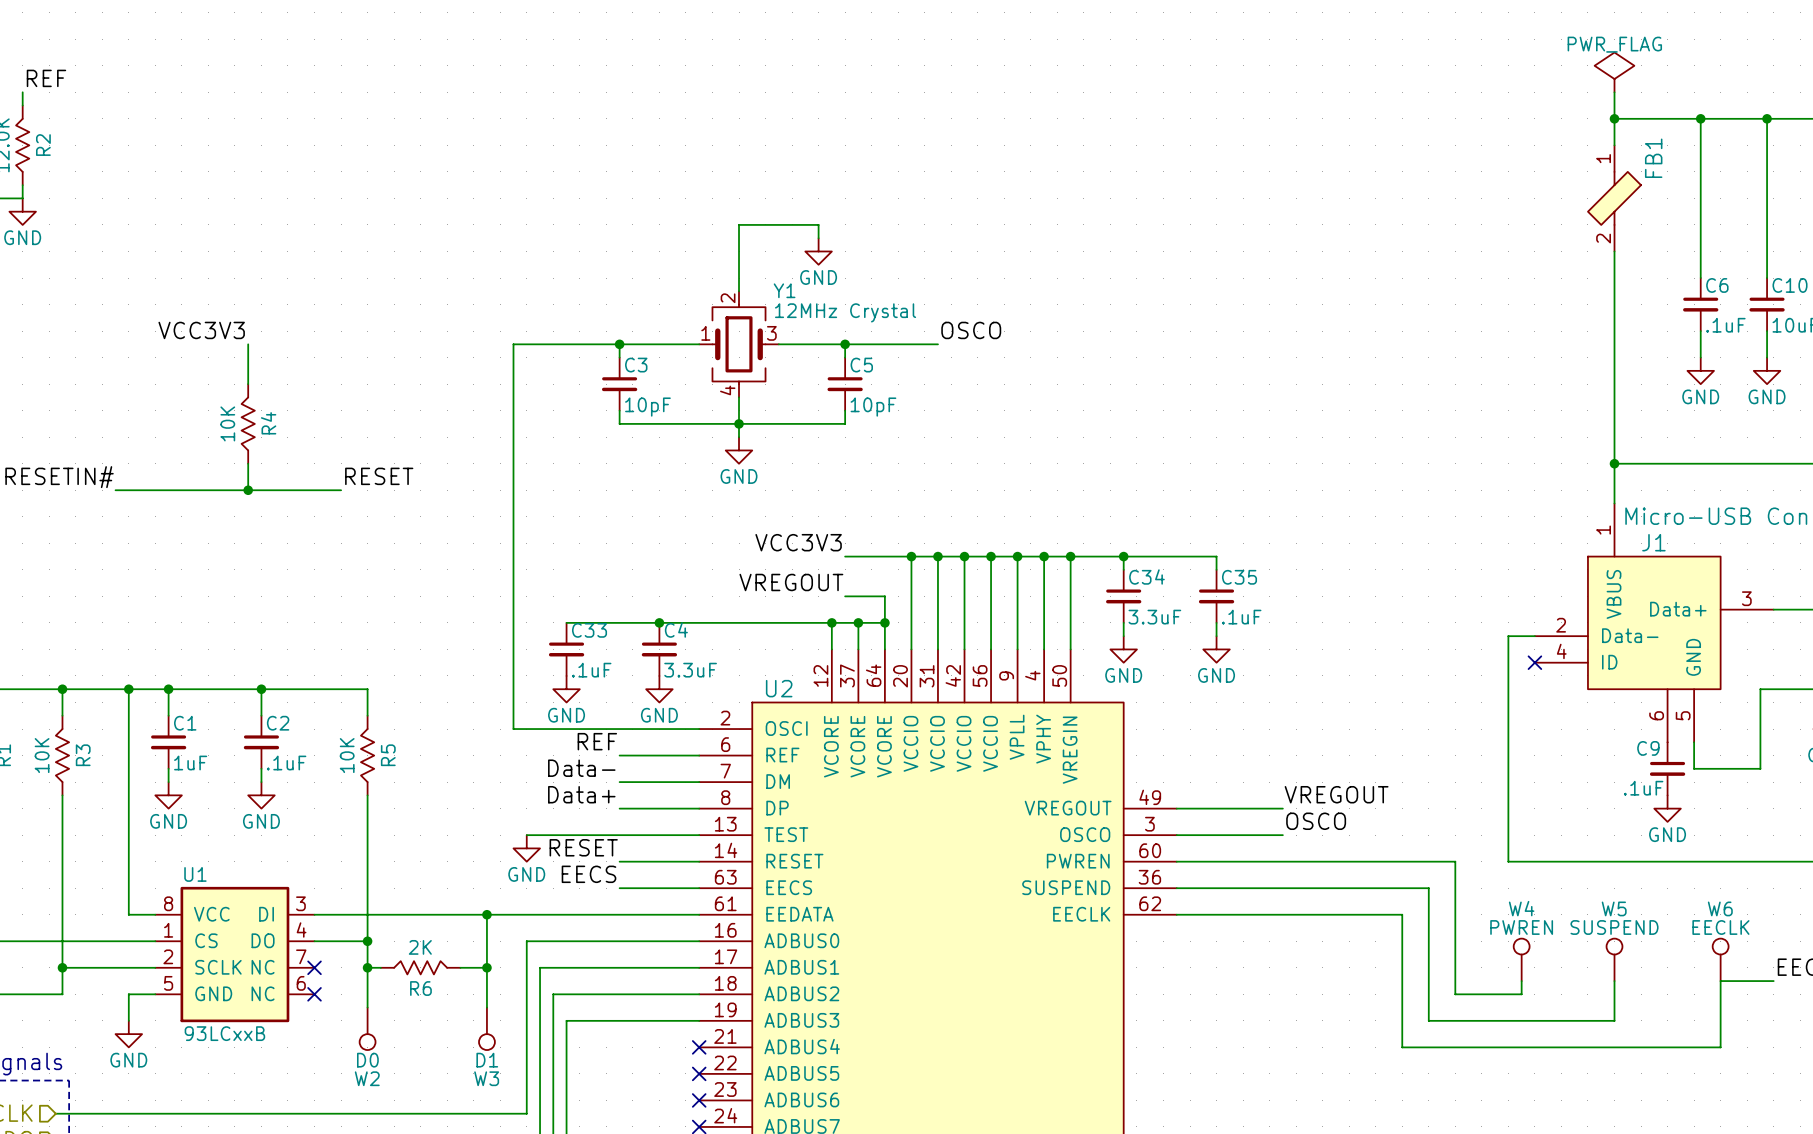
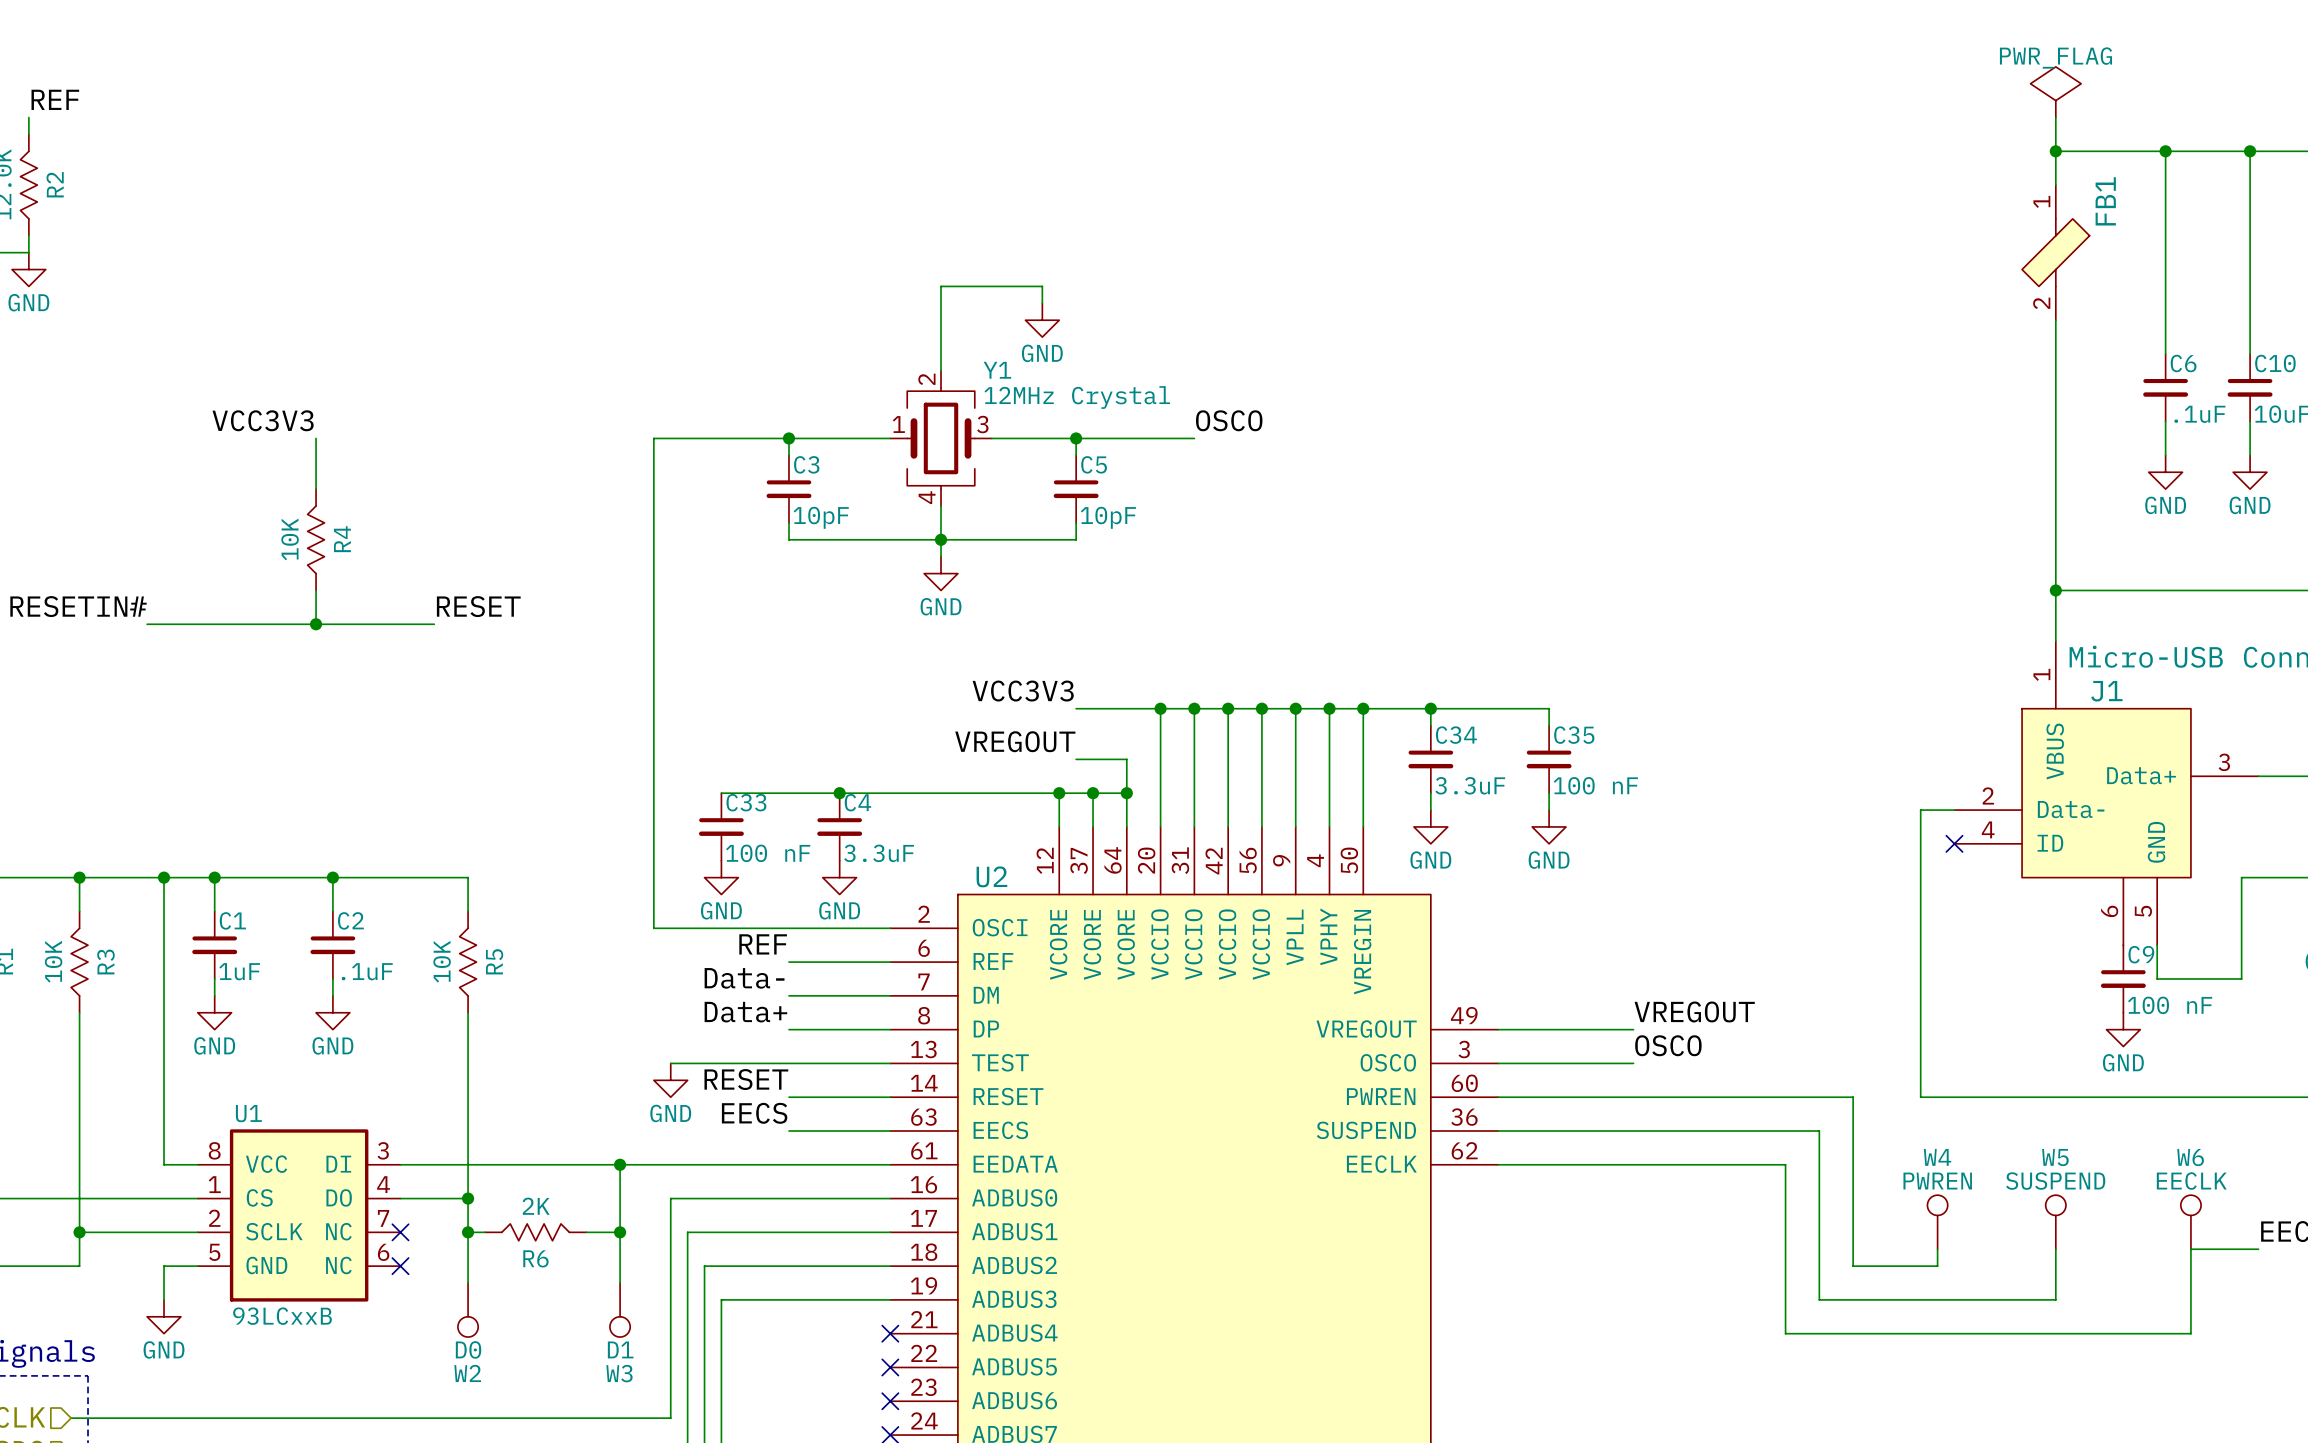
C35 value: .1uF (1241, 617) -> 100 nF (1595, 785)
C33 value: .1uF (591, 670) -> 100 nF (768, 853)
C9 name position: C9 (1648, 748) -> C9 (2141, 954)
C9 value: .1uF (1643, 788) -> 100 nF (2170, 1005)

